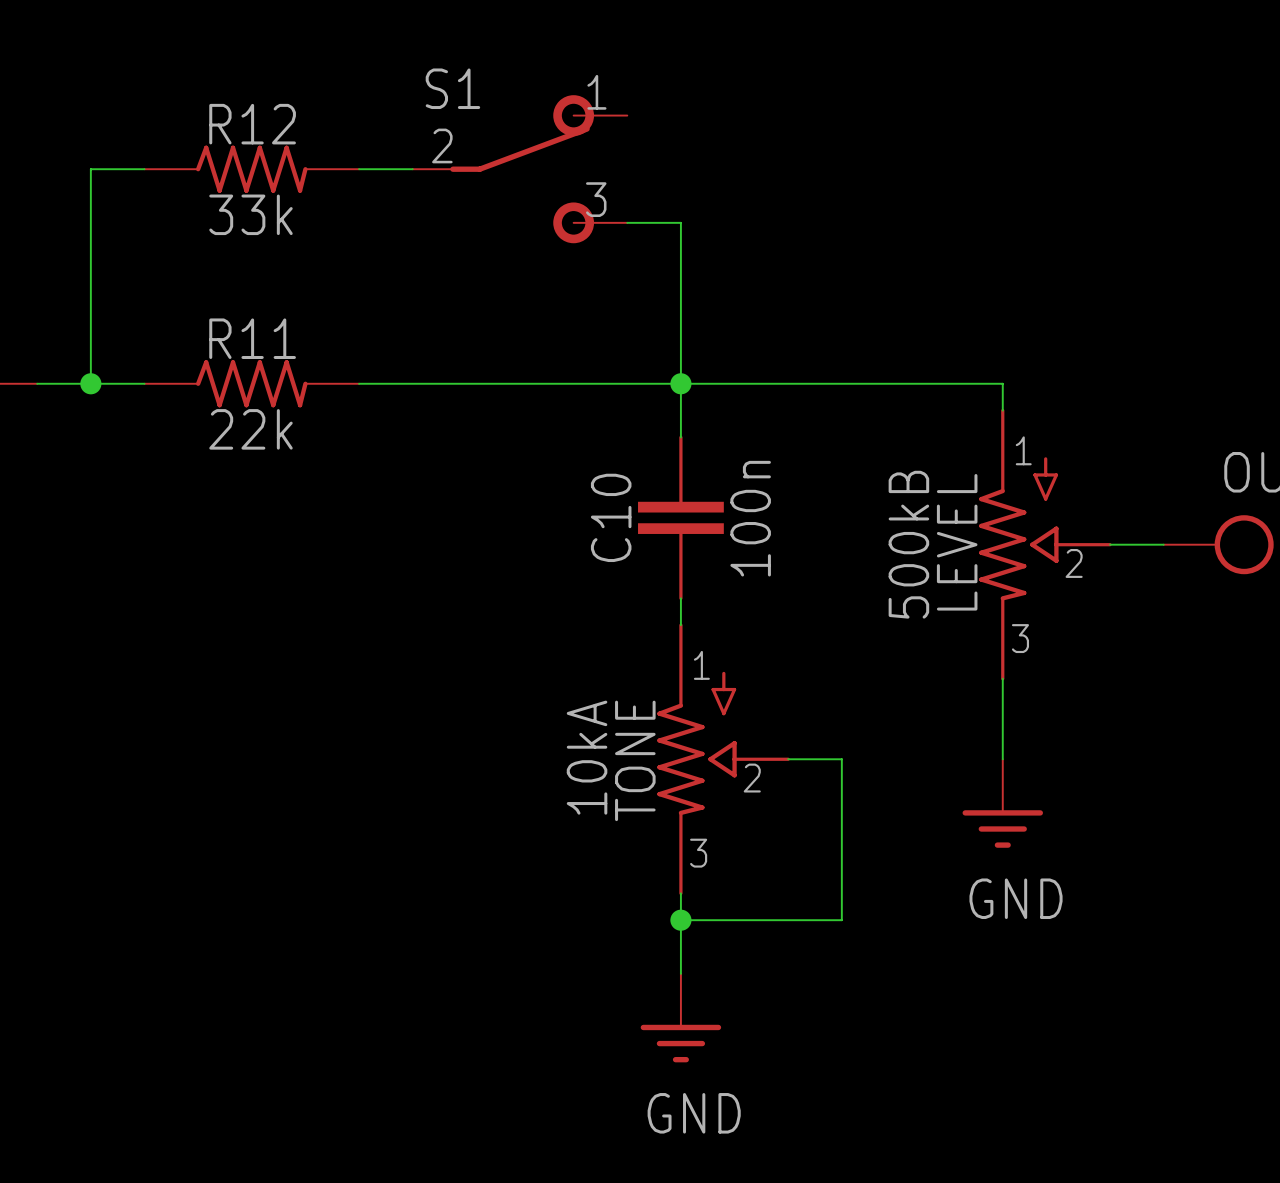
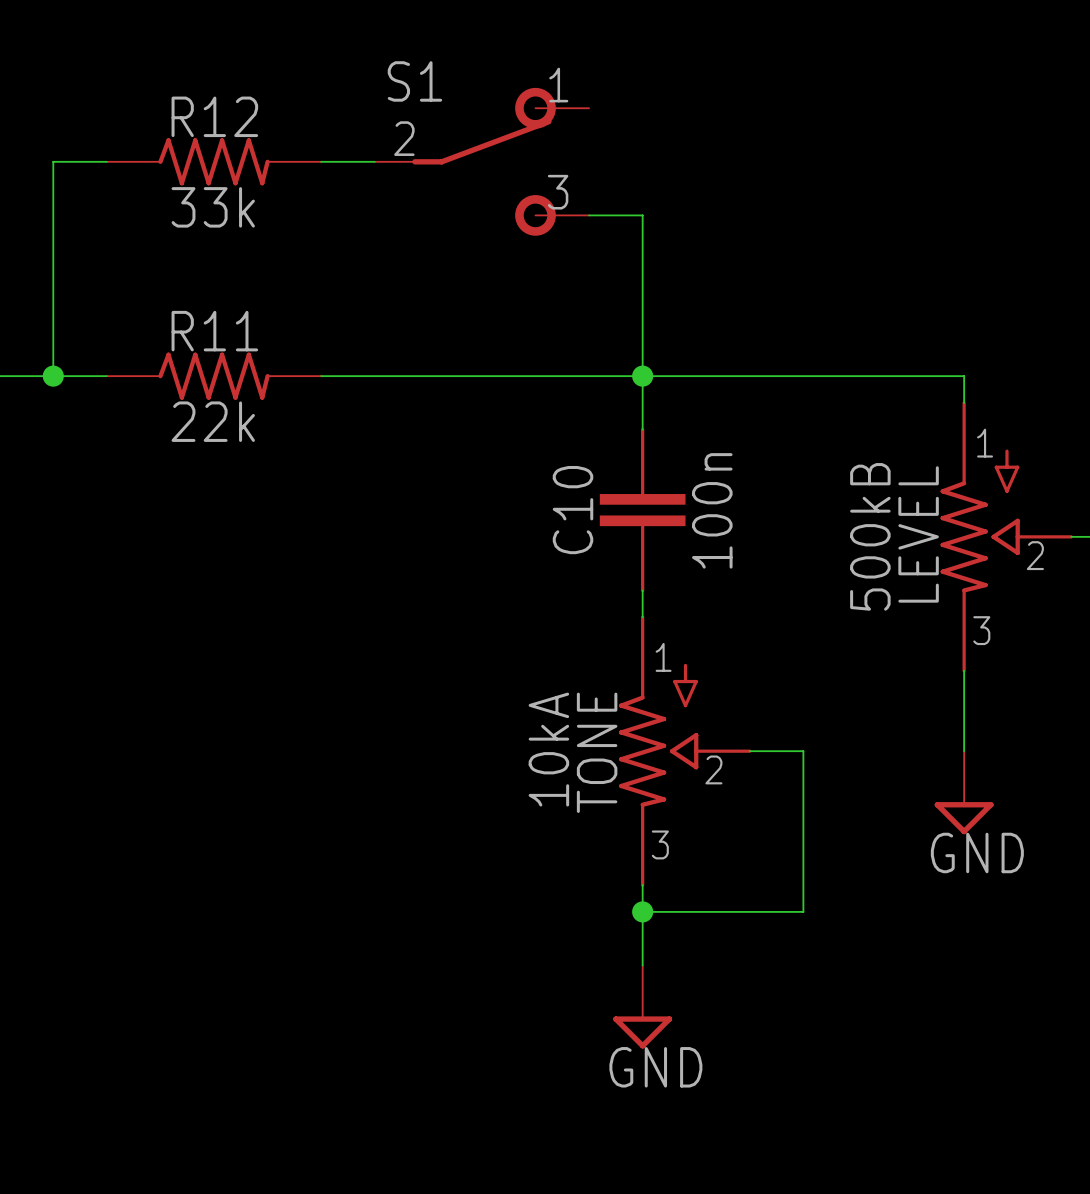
power symbol shape: [962, 759, 1044, 848] -> [934, 751, 994, 835]
power symbol text position: GND (1016, 898) -> GND (977, 852)
power symbol shape: [640, 973, 722, 1063] -> [613, 965, 673, 1049]
power symbol text position: GND (694, 1113) -> GND (655, 1067)

